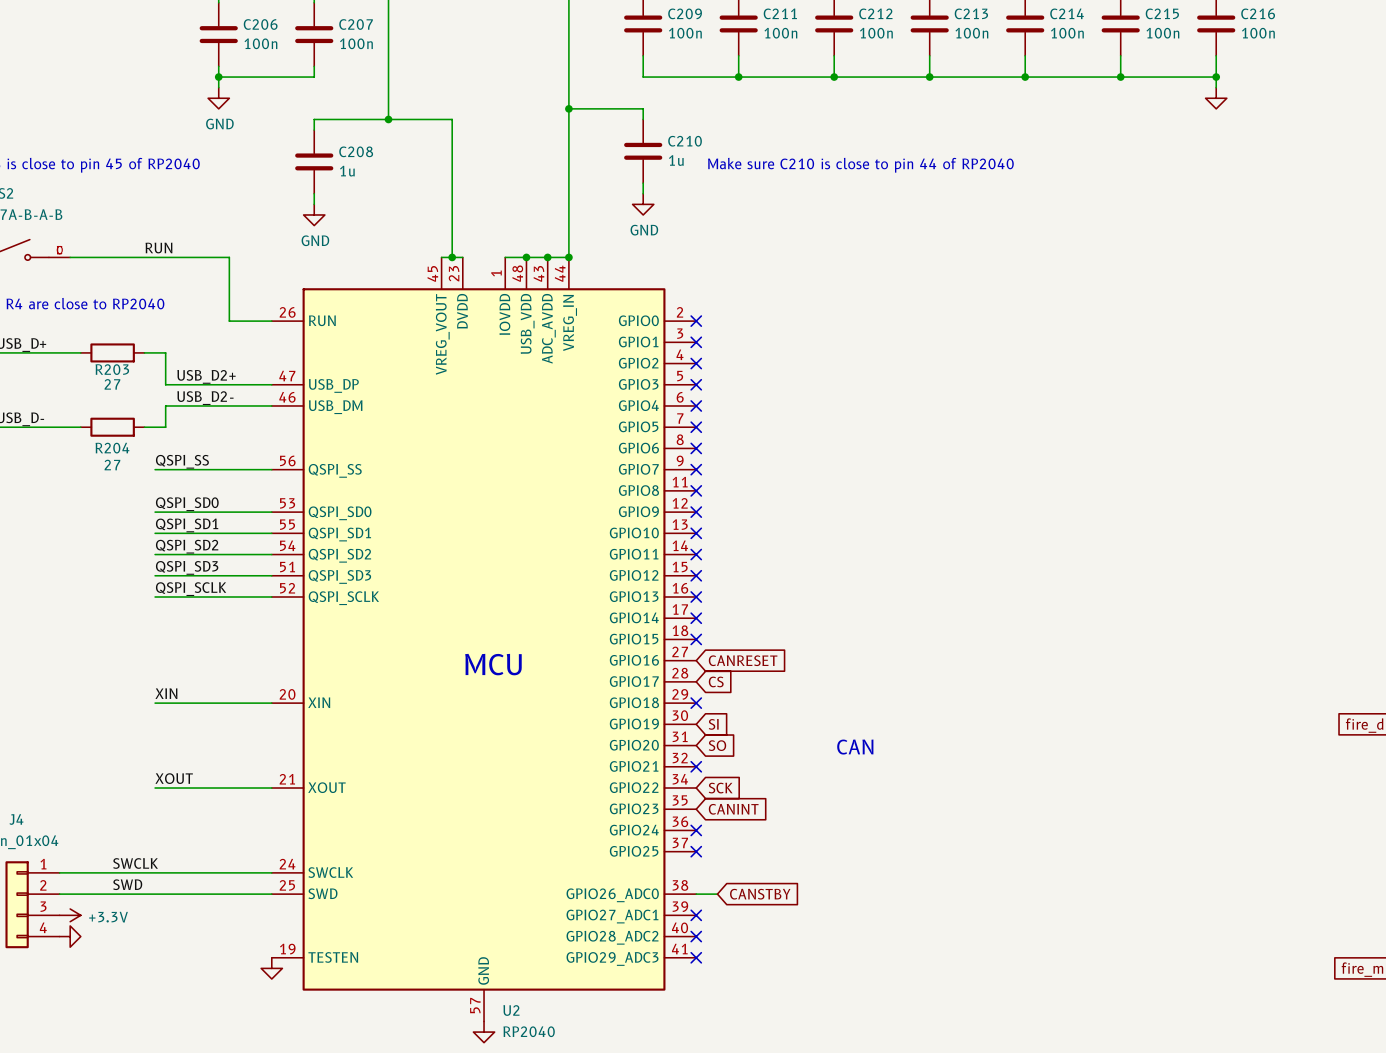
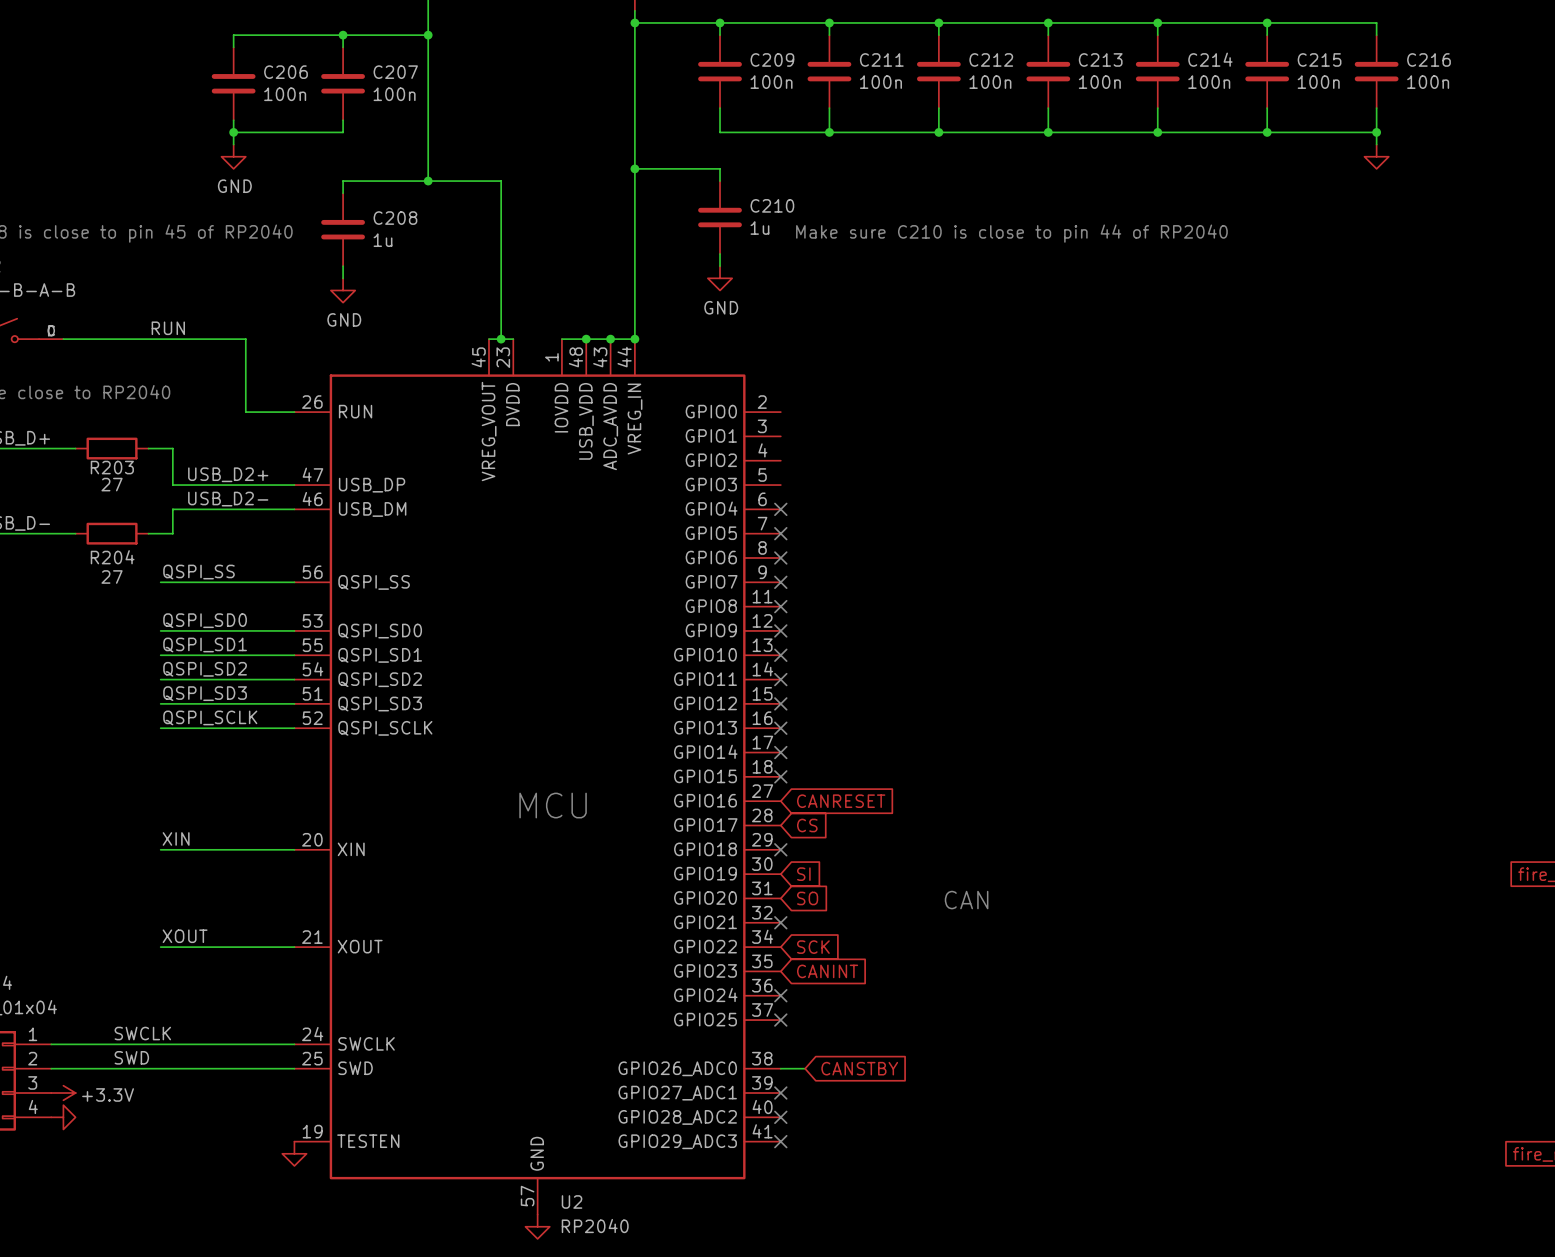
no-connect mark: (696, 321) -> none
no-connect mark: (696, 342) -> none
no-connect mark: (696, 363) -> none
no-connect mark: (696, 384) -> none

